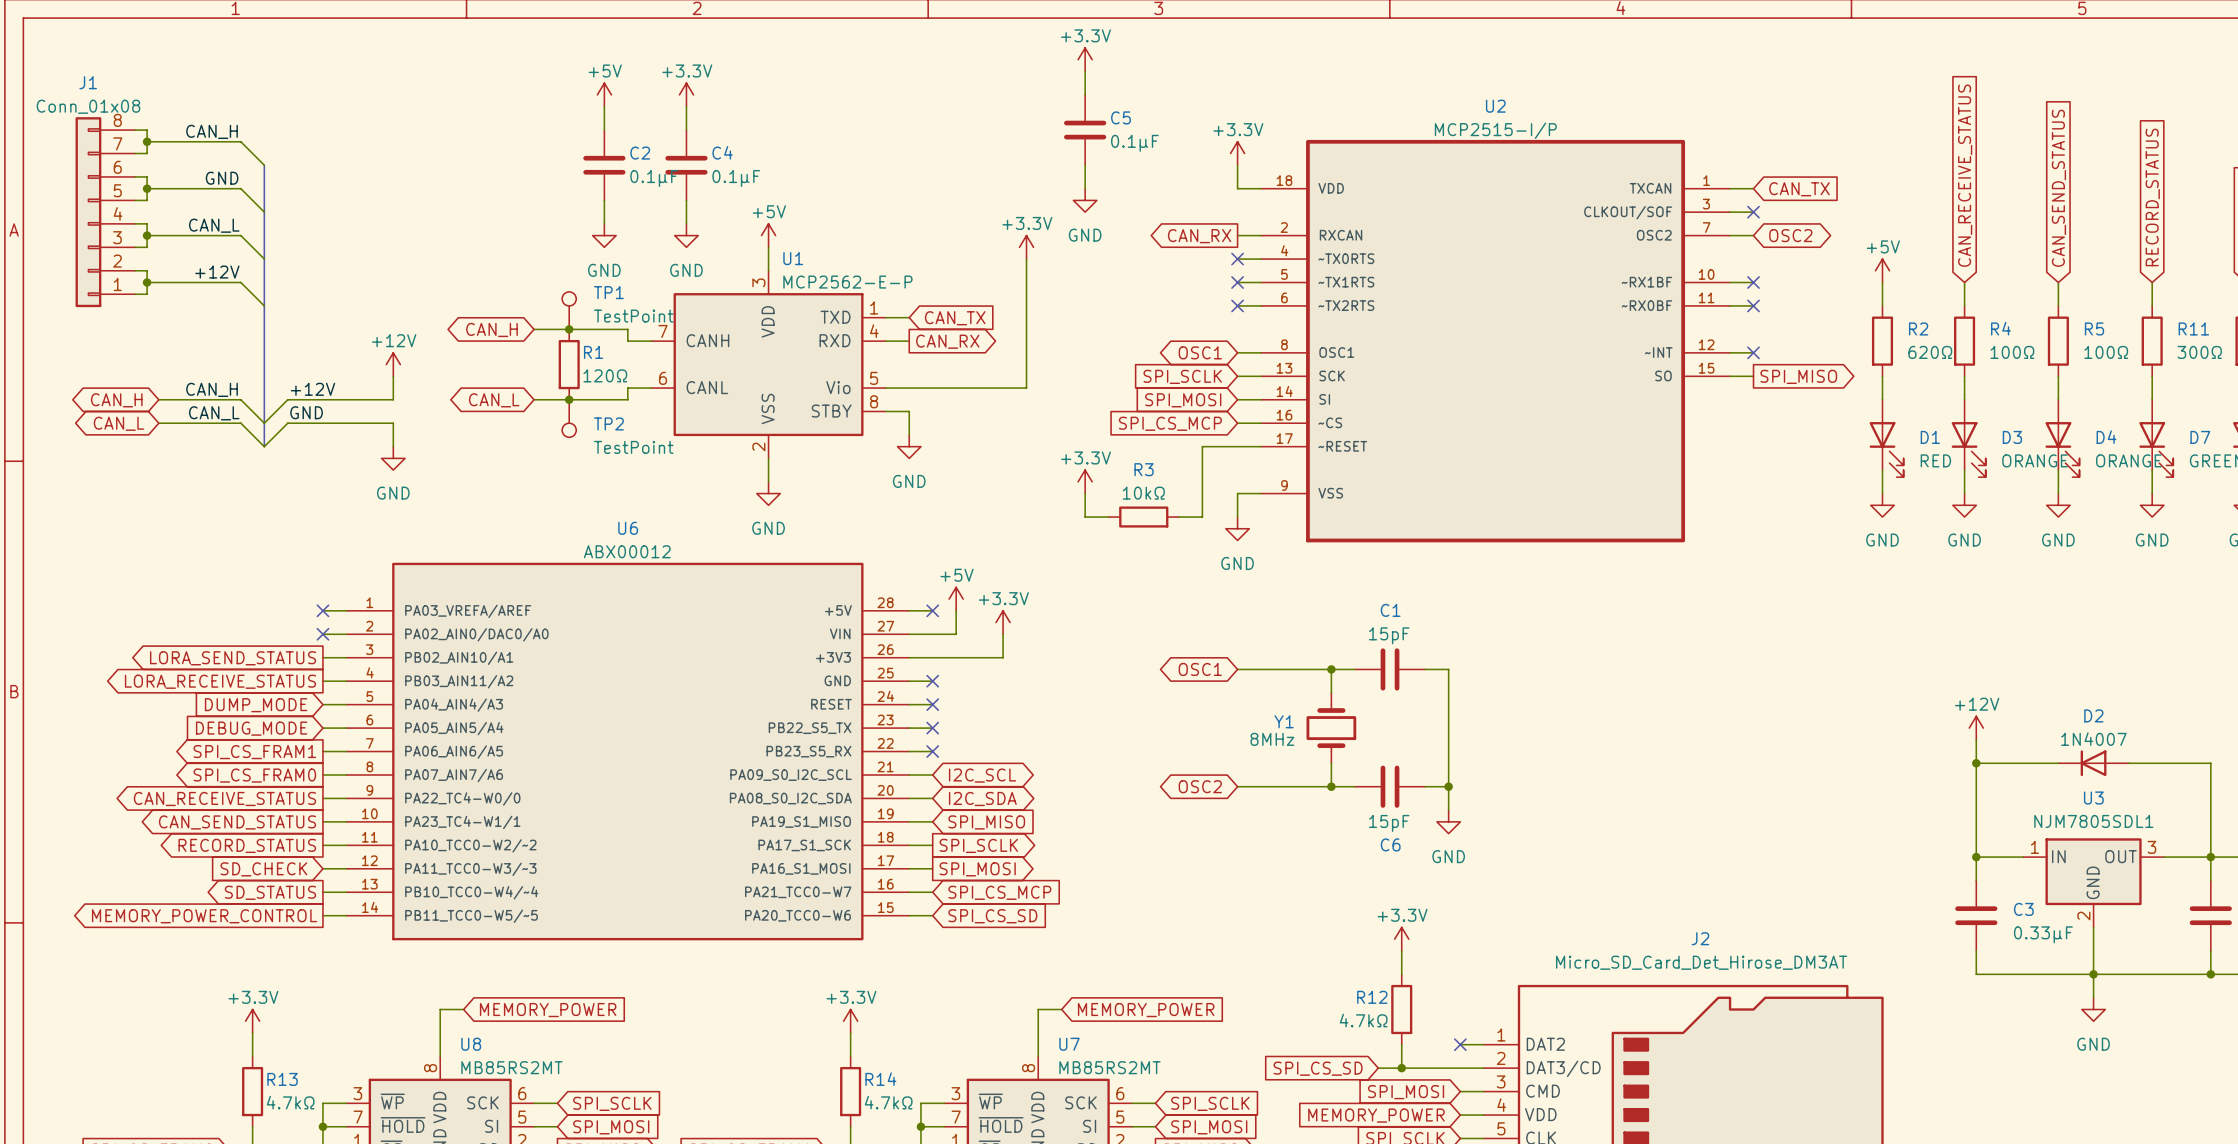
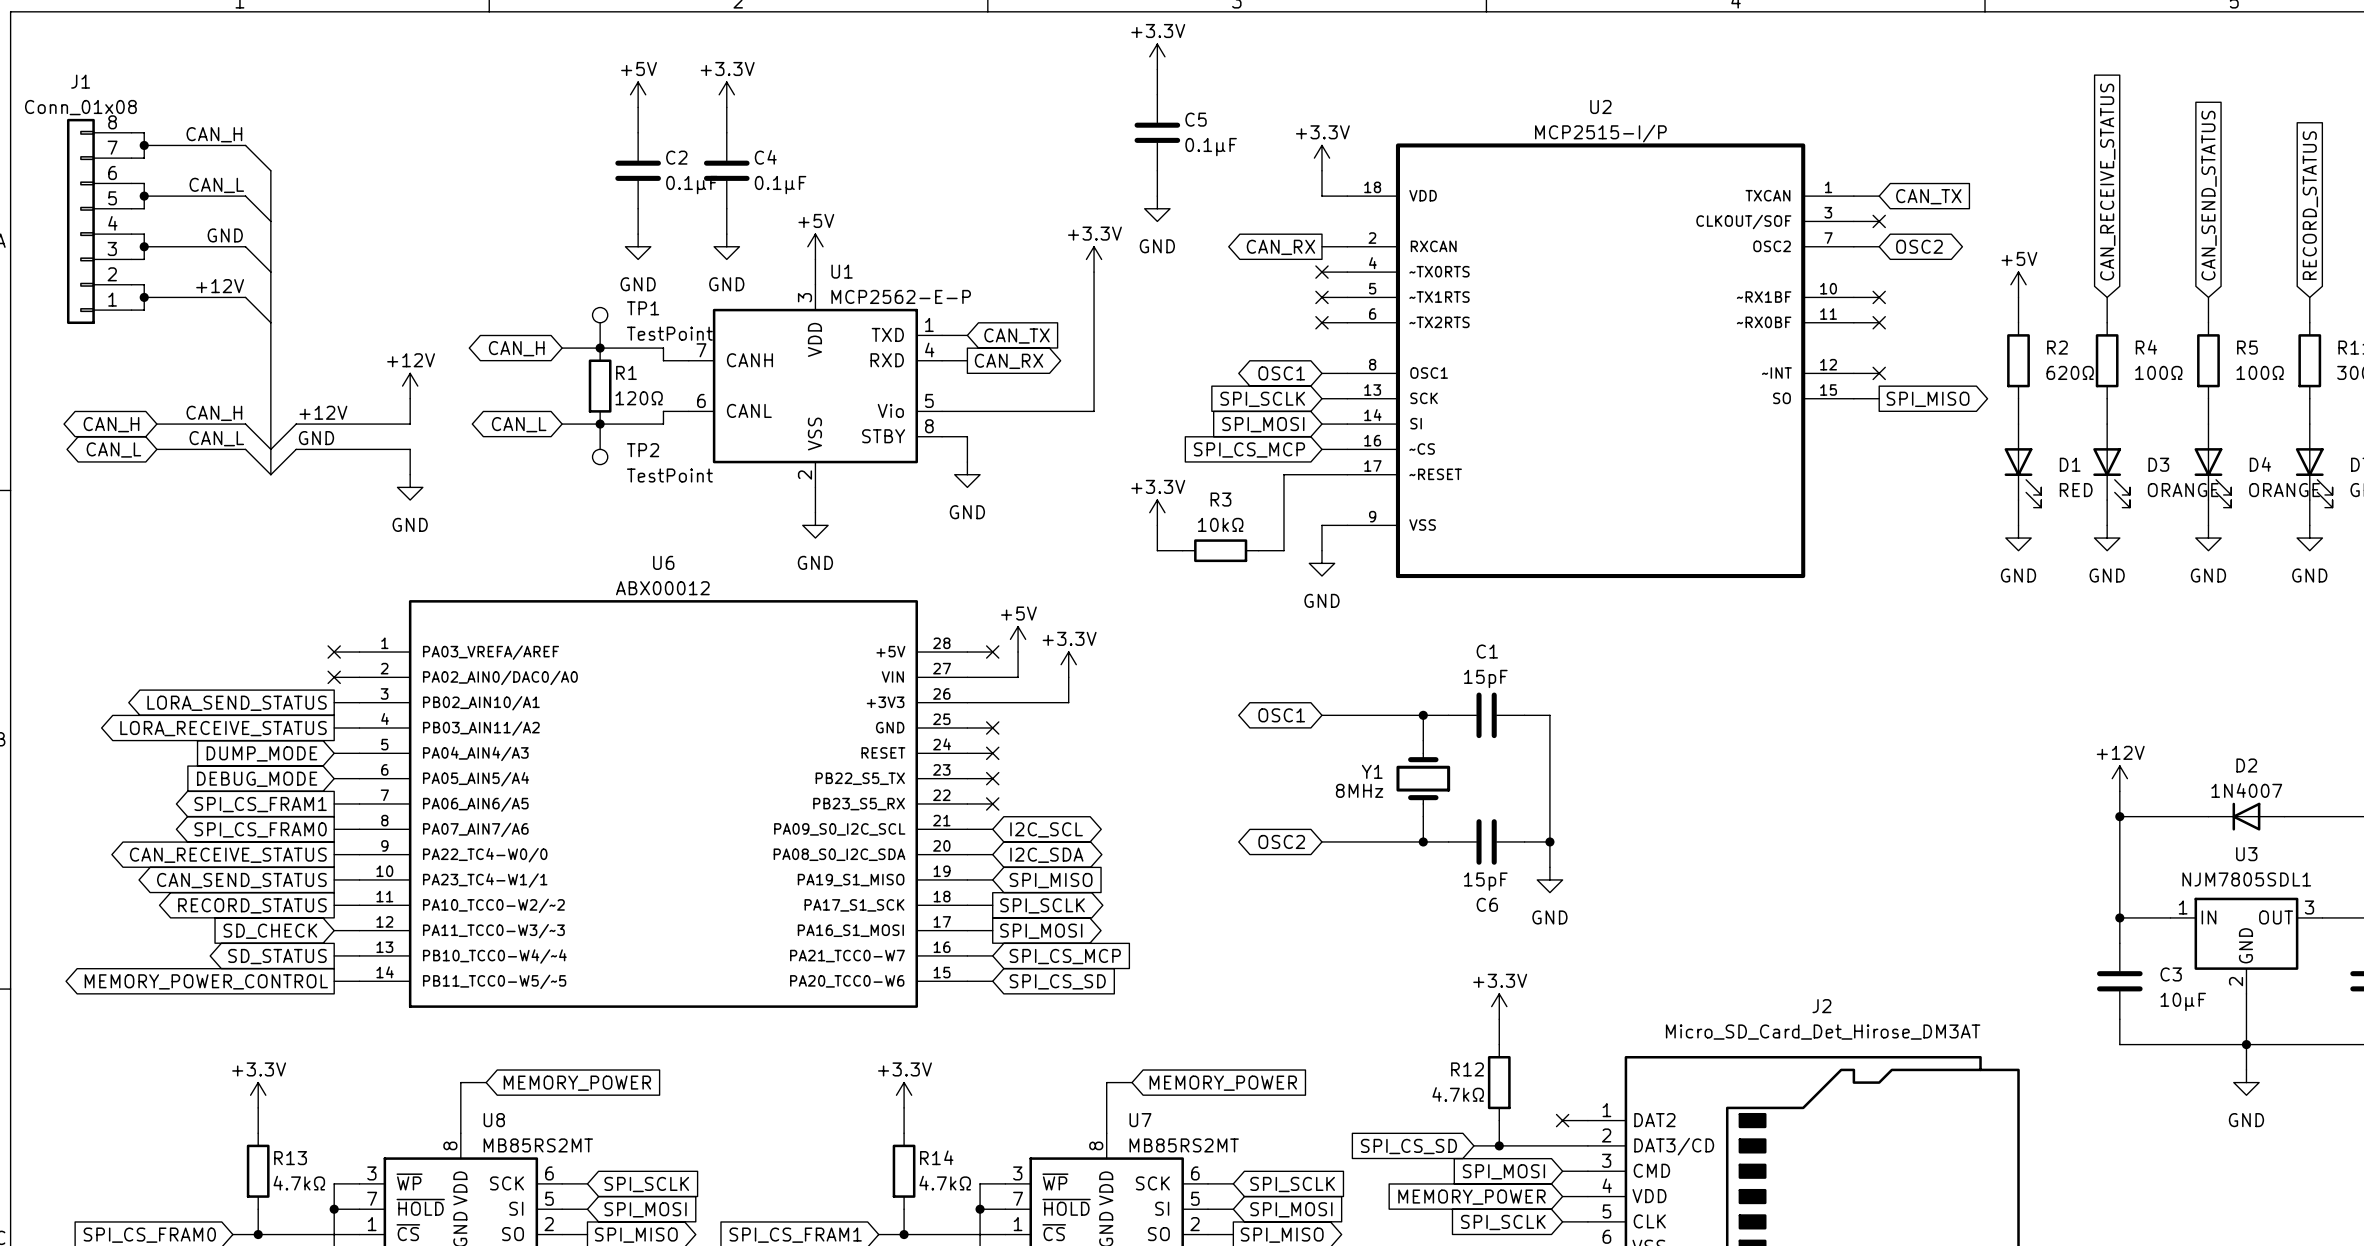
label: GND (222, 178) -> CAN_L (216, 185)
label: CAN_L (214, 225) -> GND (225, 235)
C3 value: 0.33μF (2043, 934) -> 10μF (2183, 1001)

